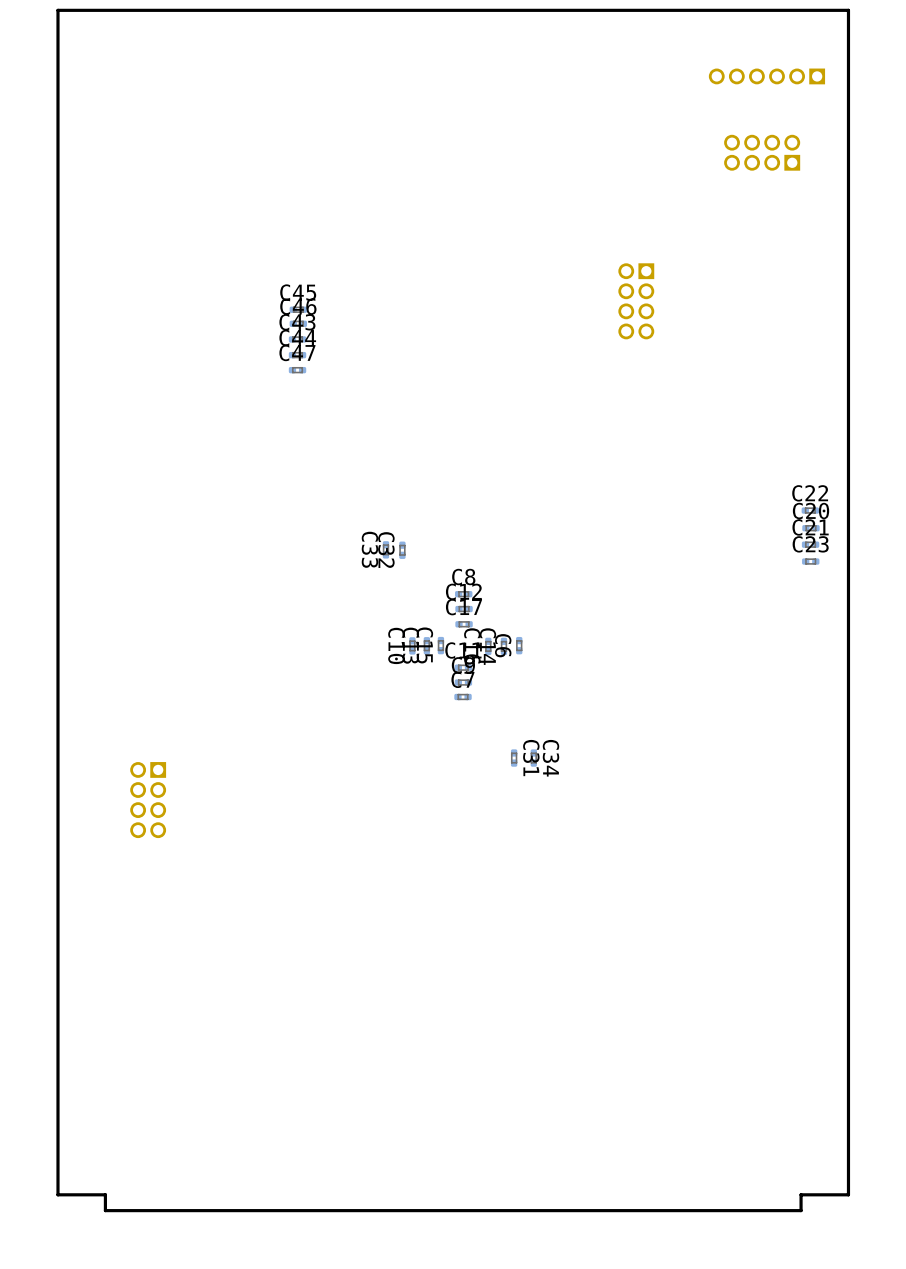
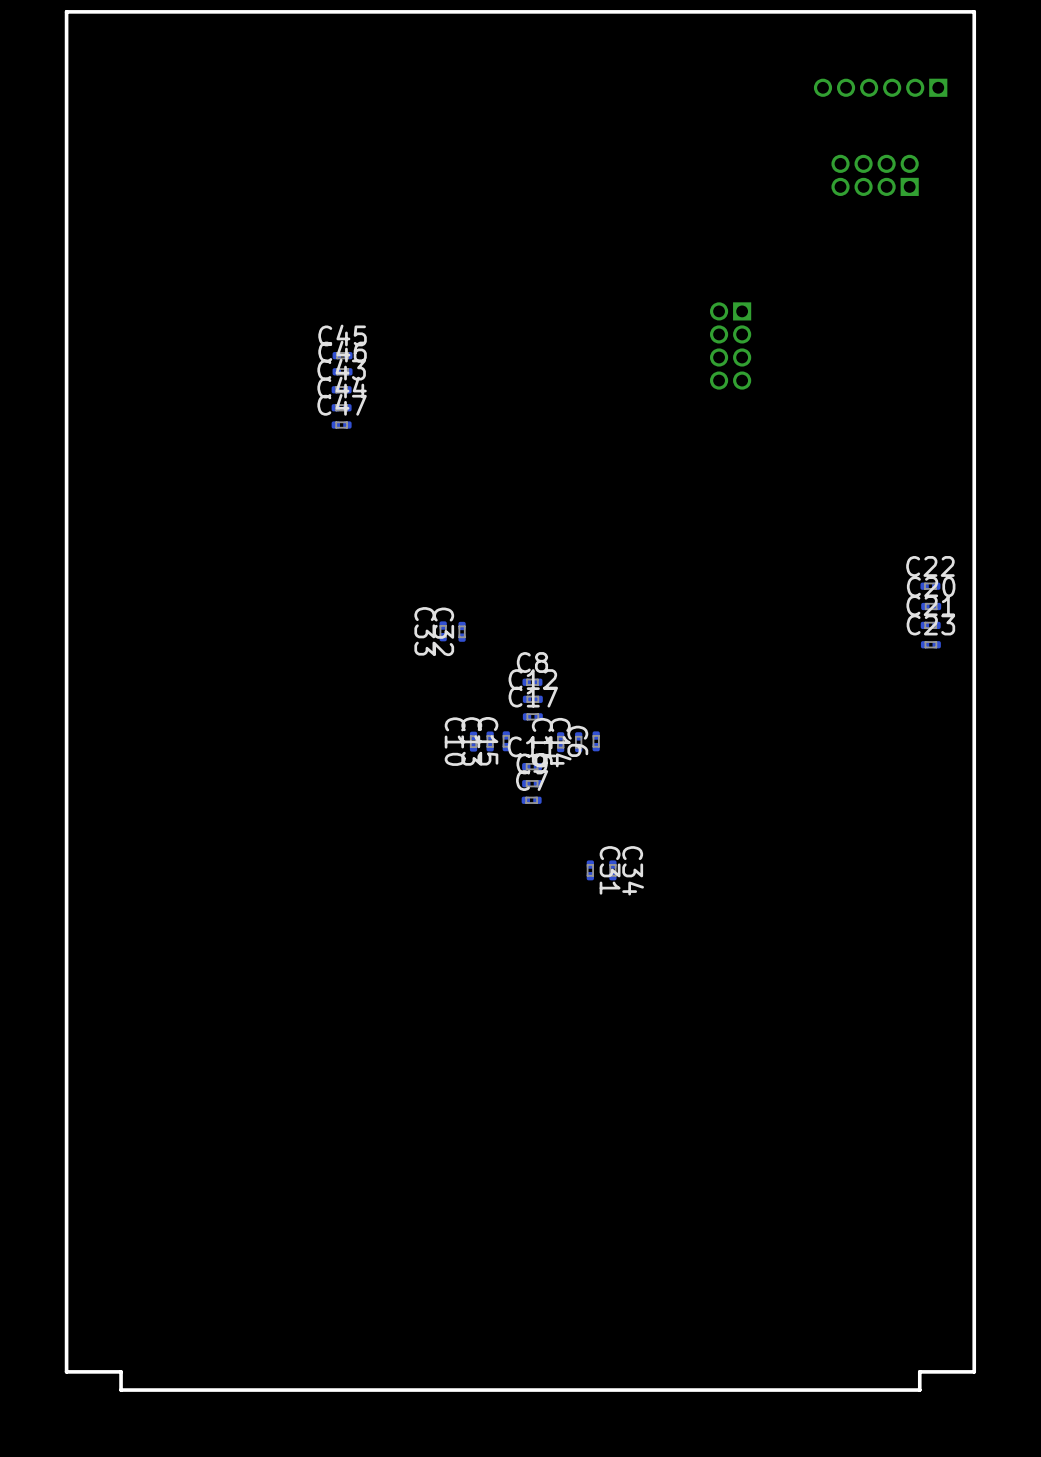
part: (148, 800) -> none

